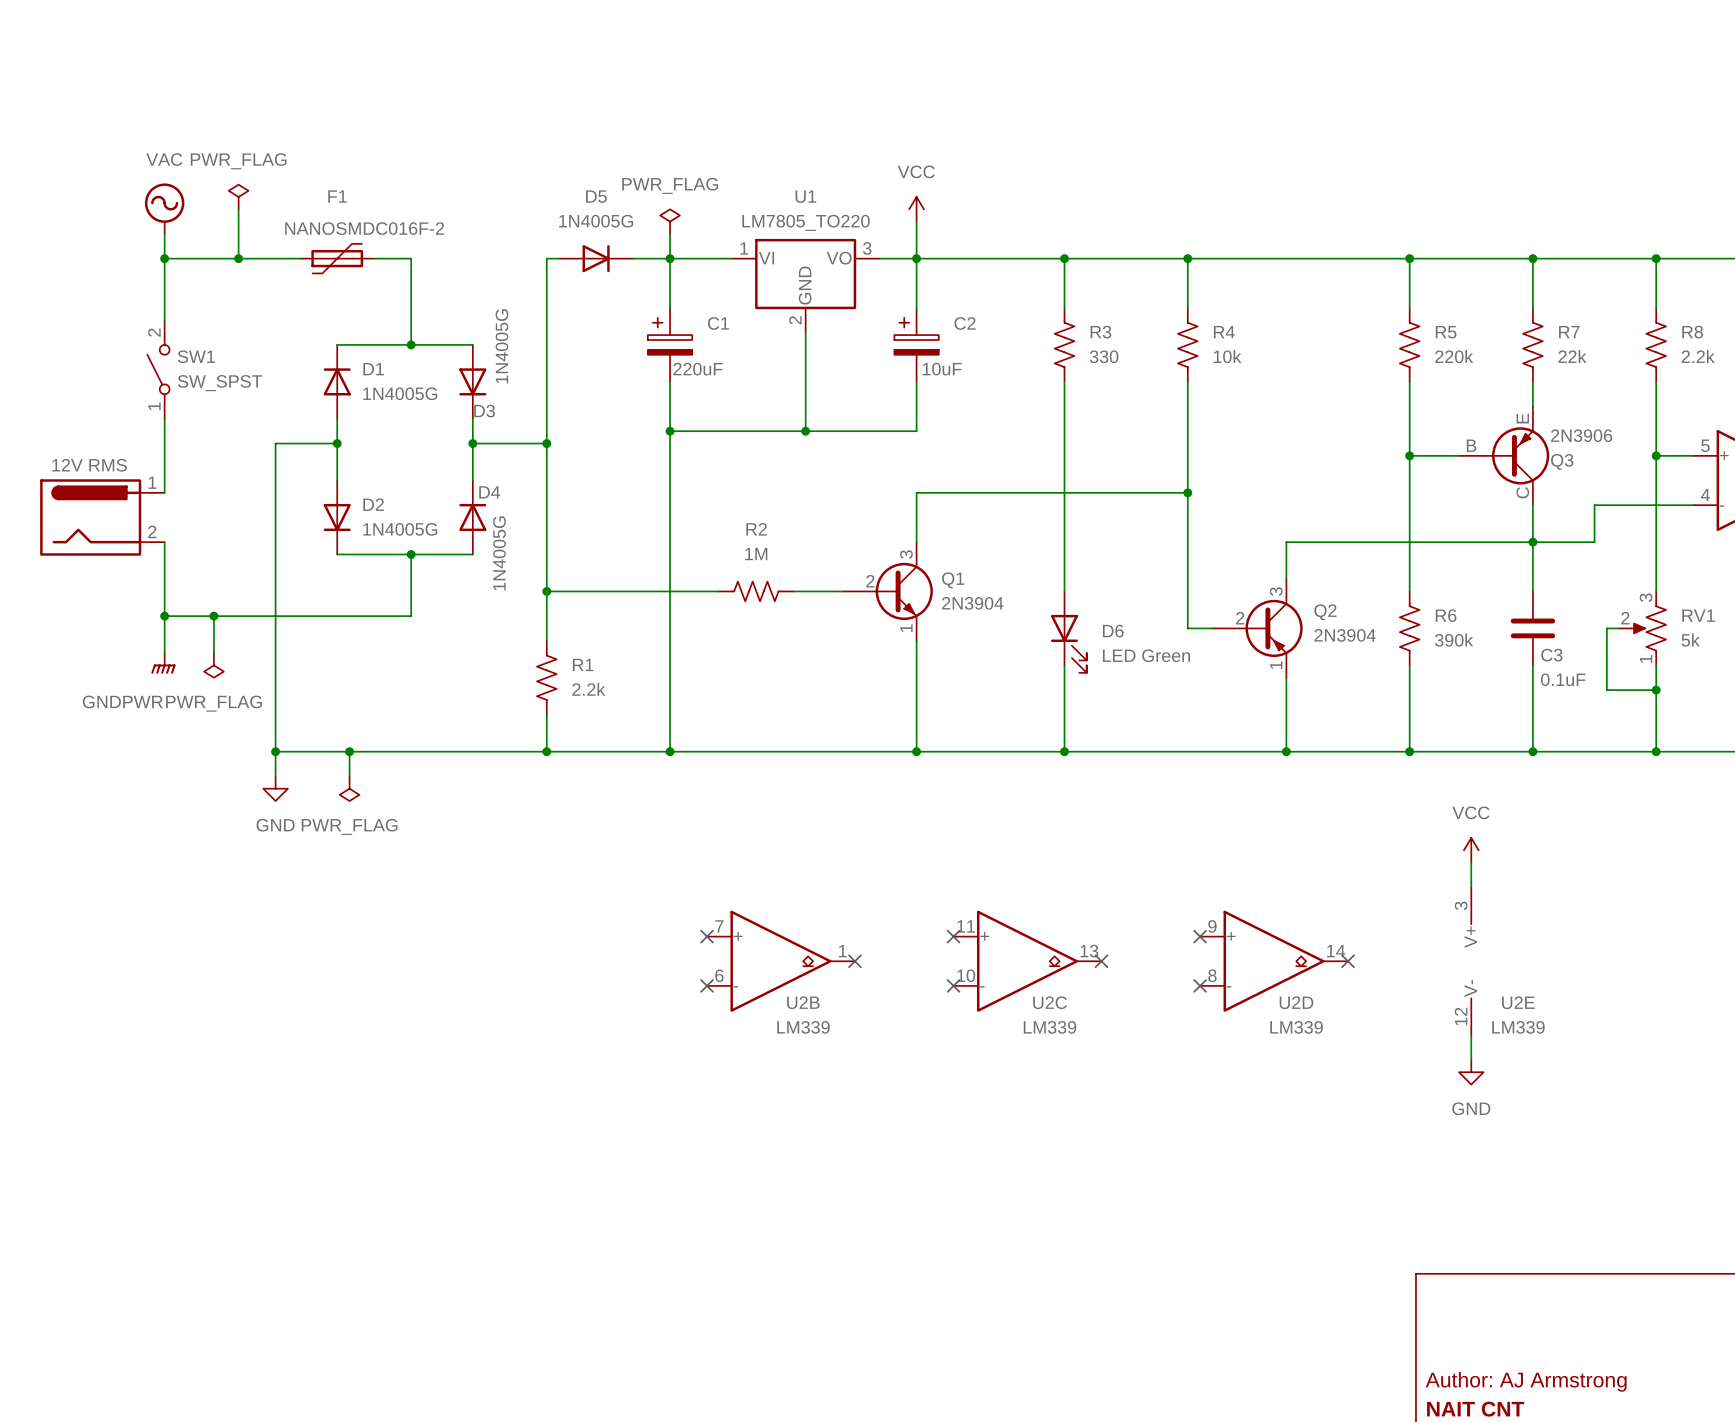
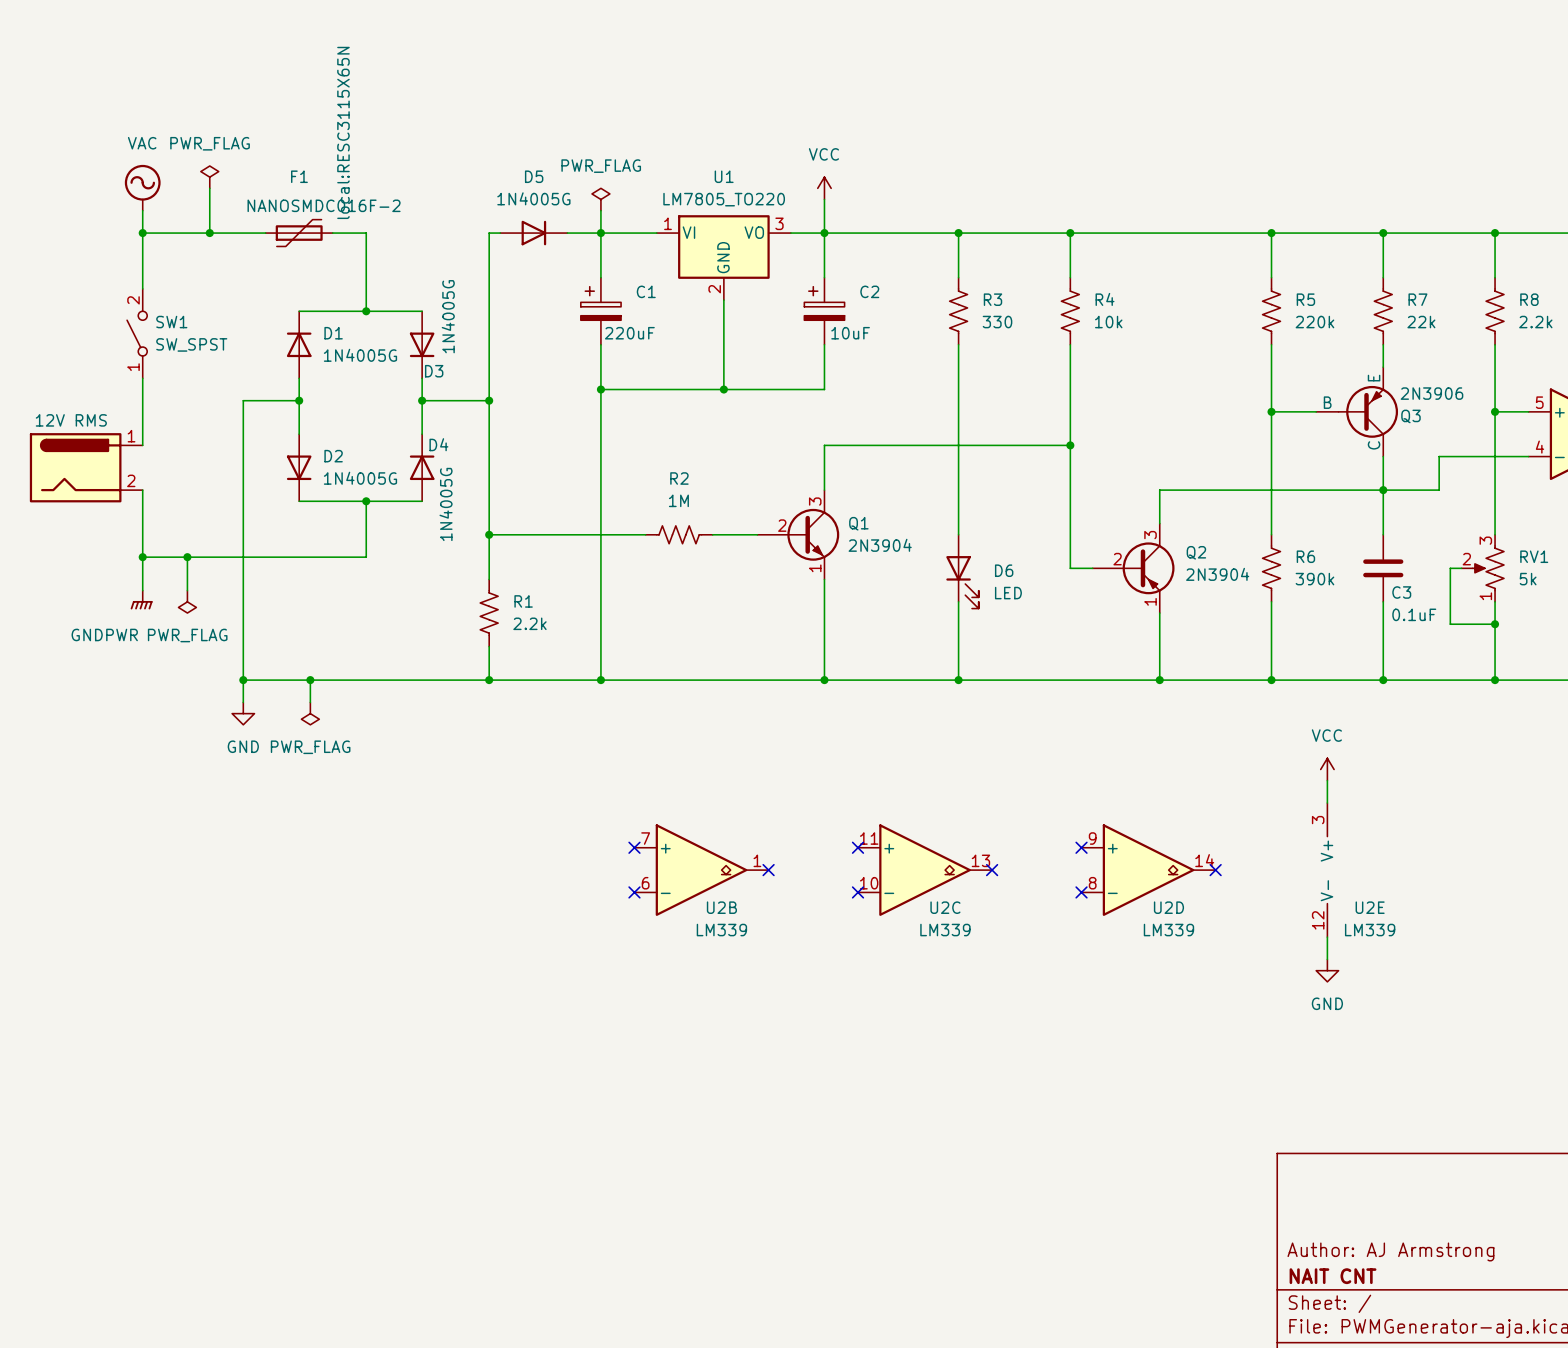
F1 text: none -> local:RESC3115X65N (343, 132)
D6 value: LED Green (1146, 655) -> LED (1008, 593)

